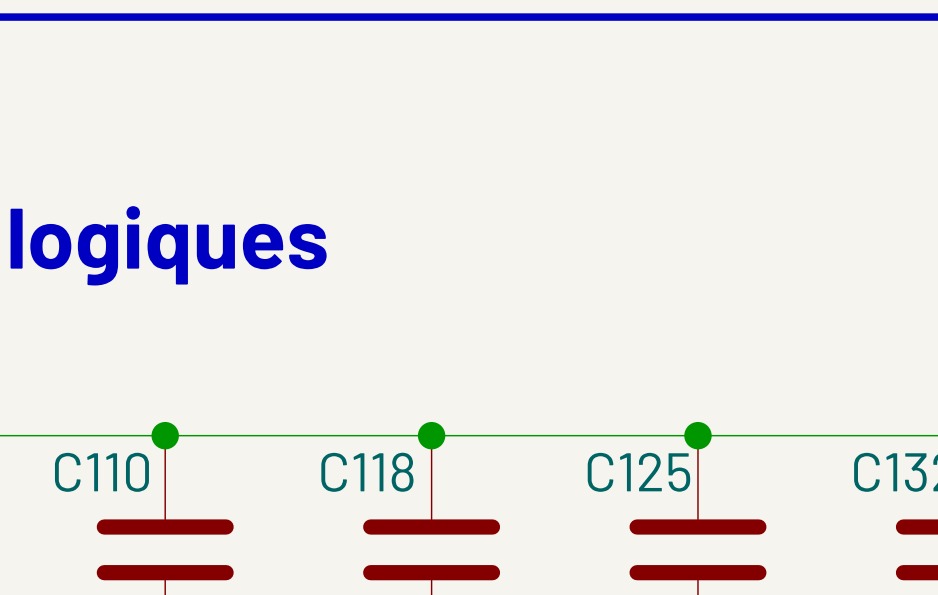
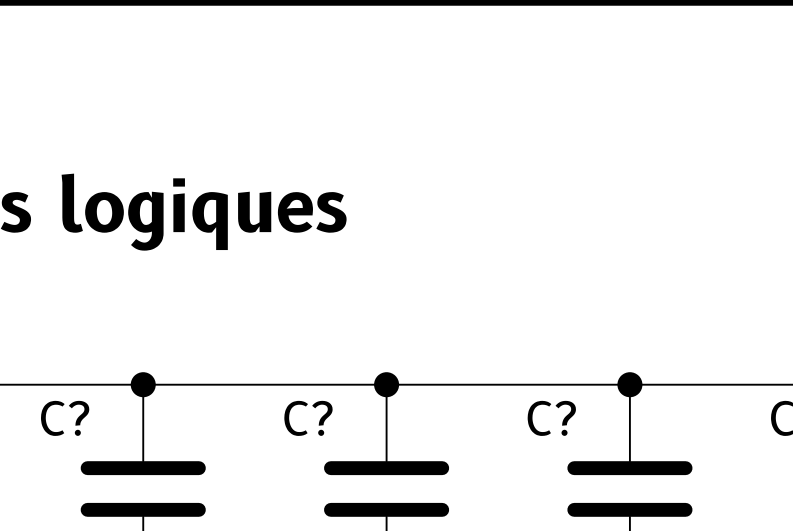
C110 name: C110 (101, 472) -> C? (65, 418)
C118 name: C118 (367, 472) -> C? (308, 418)
C125 name: C125 (638, 472) -> C? (551, 418)

